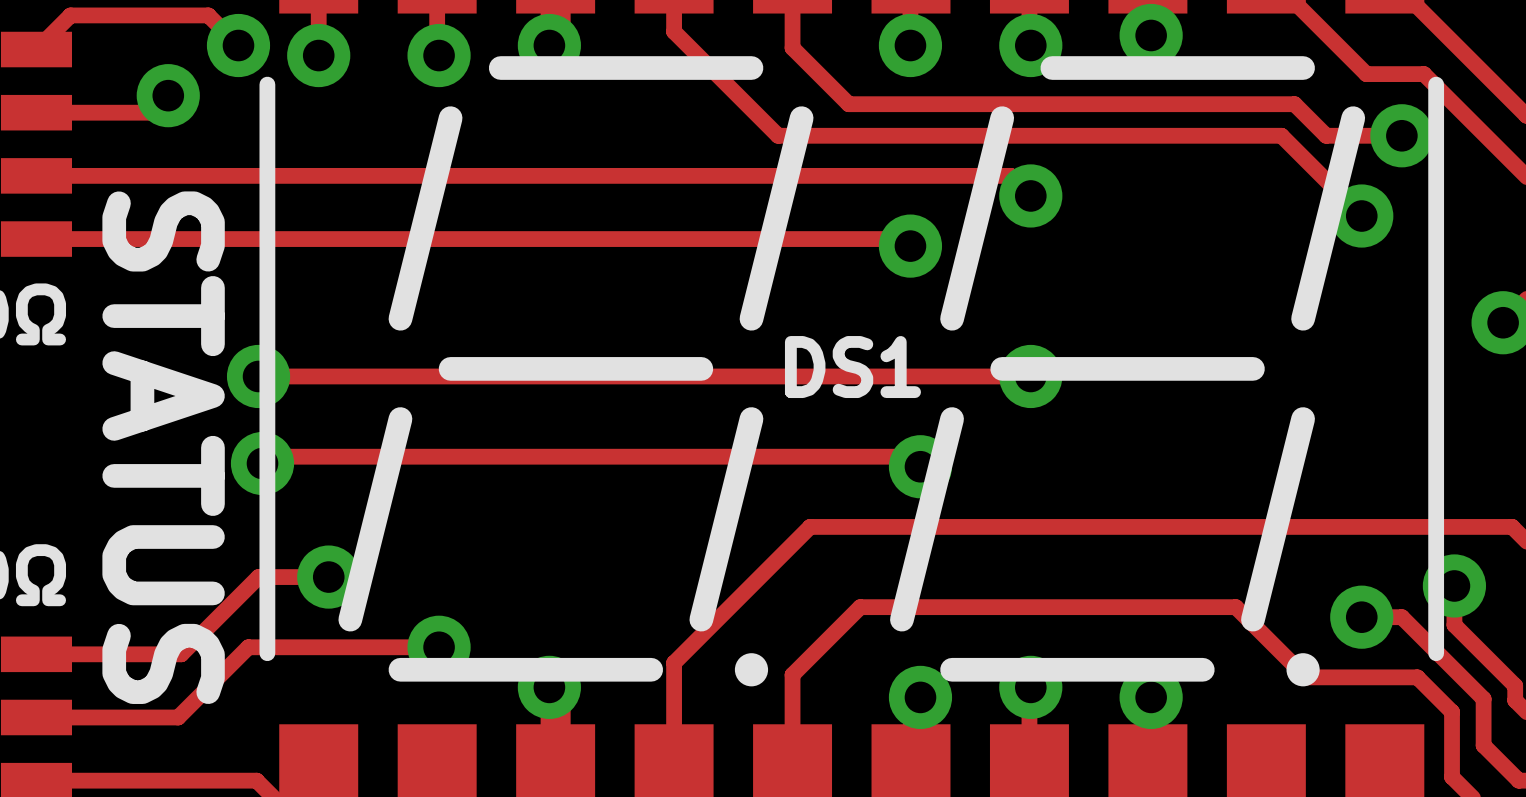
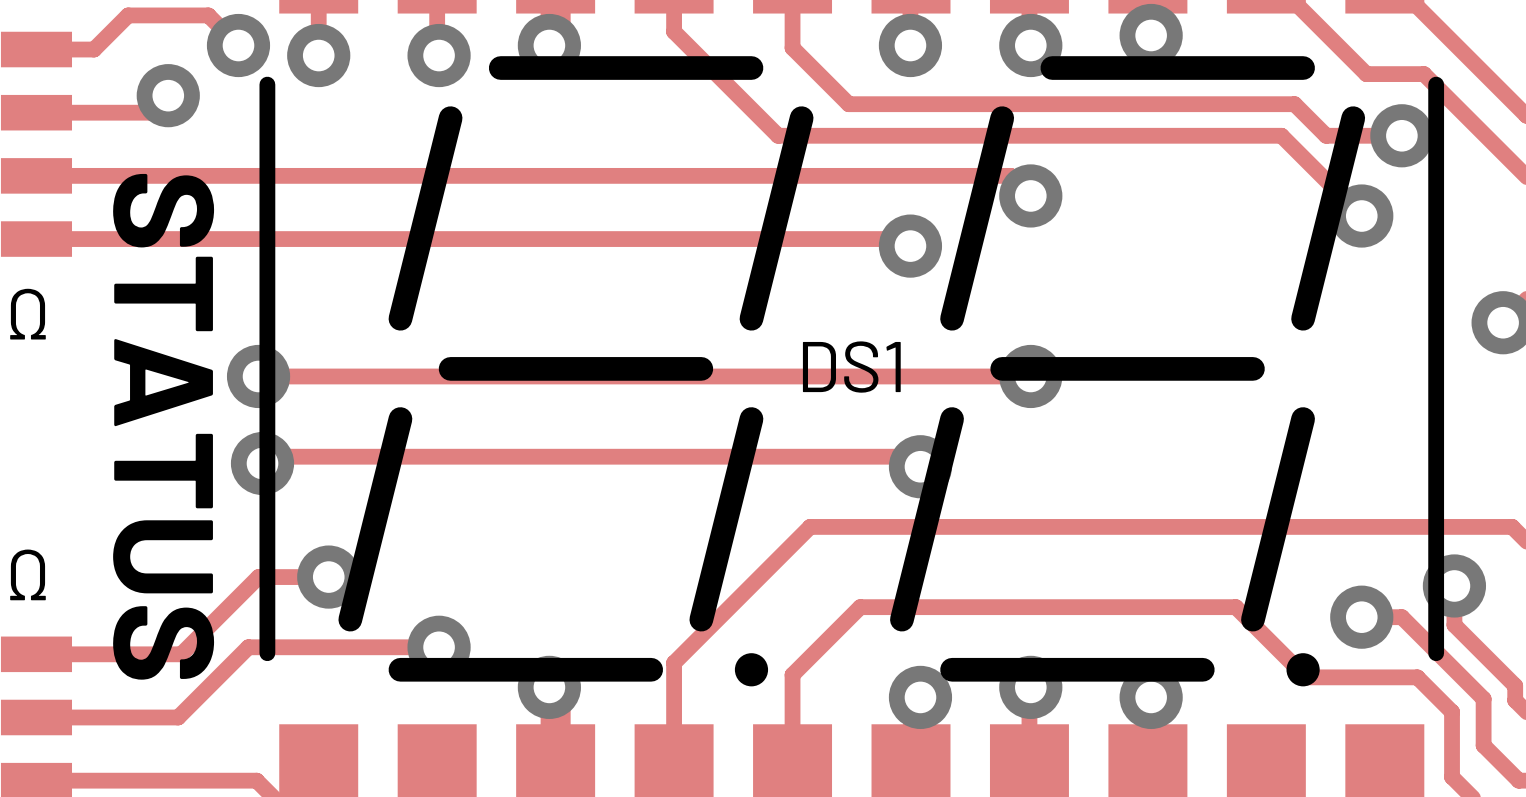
track: (128, 15) (70, 15) (36, 49) -> (128, 15) (94, 49) (36, 49)

